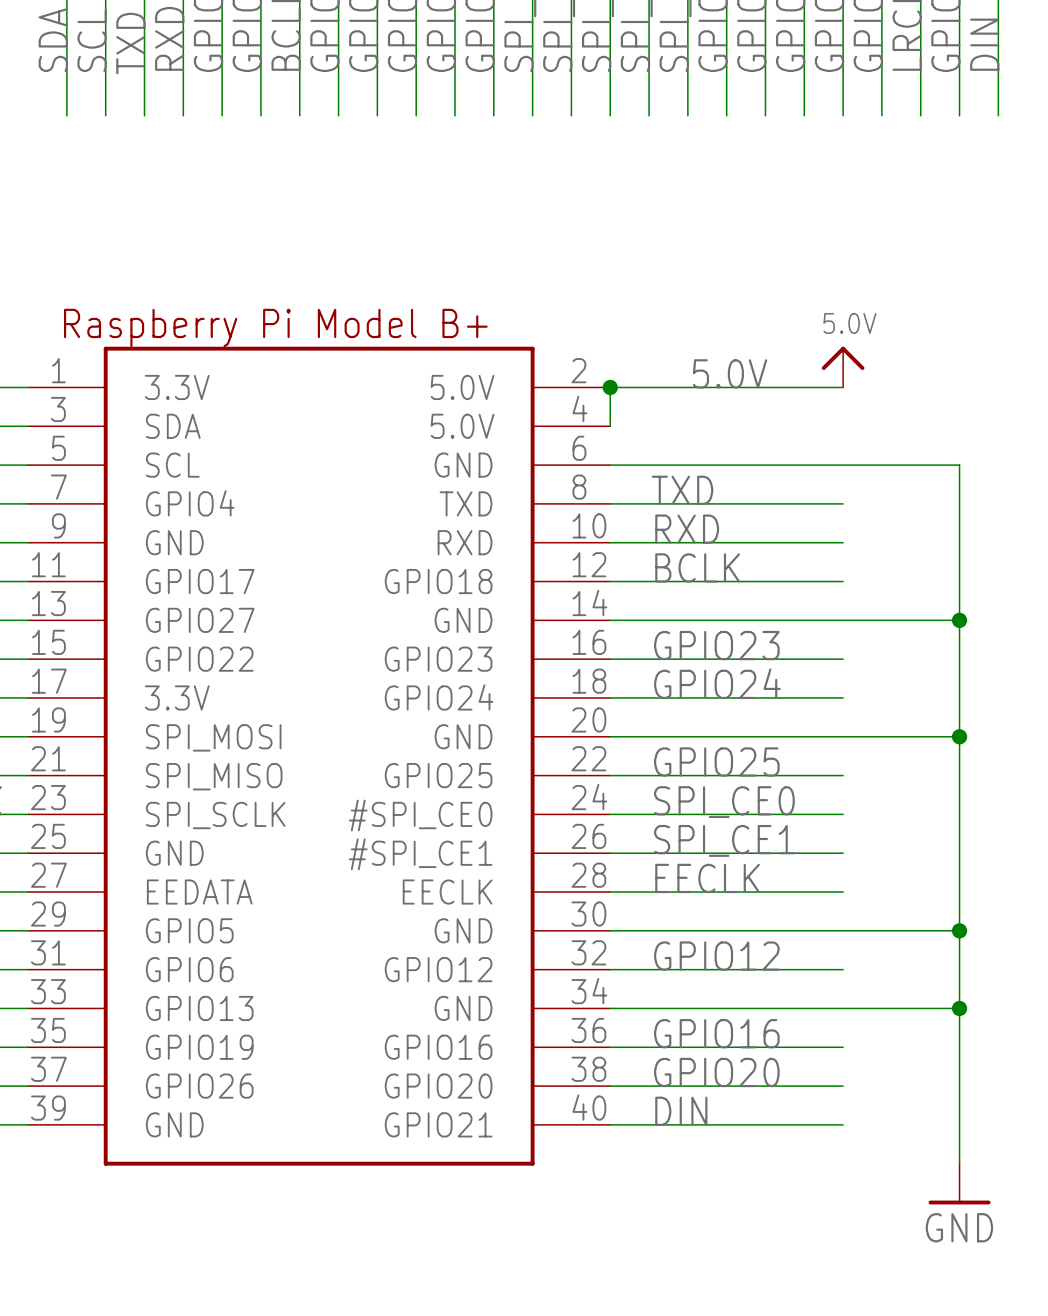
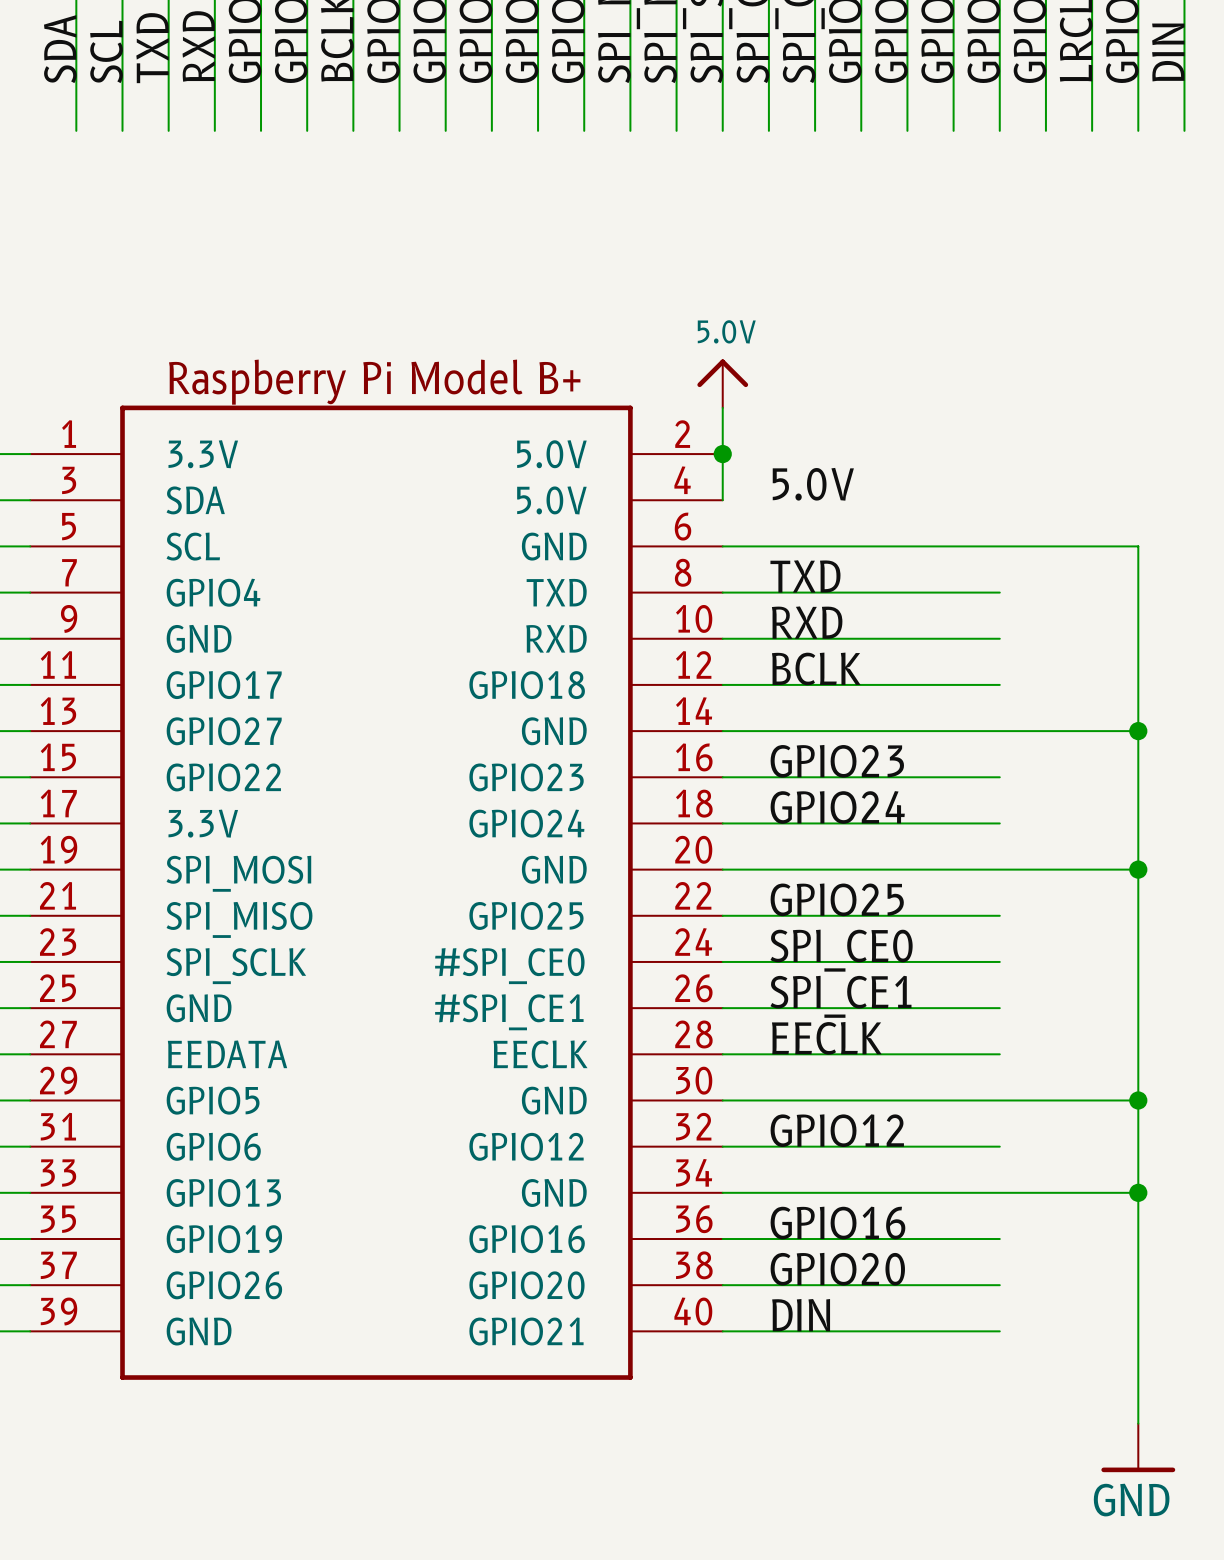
power symbol position: 5.0V (843, 367) -> 5.0V (722, 383)
label position: 5.0V (730, 373) -> 5.0V (813, 484)
wire: (610, 387) (843, 387) -> (722, 454) (722, 407)
power symbol position: GND (959, 1184) -> GND (1138, 1447)

